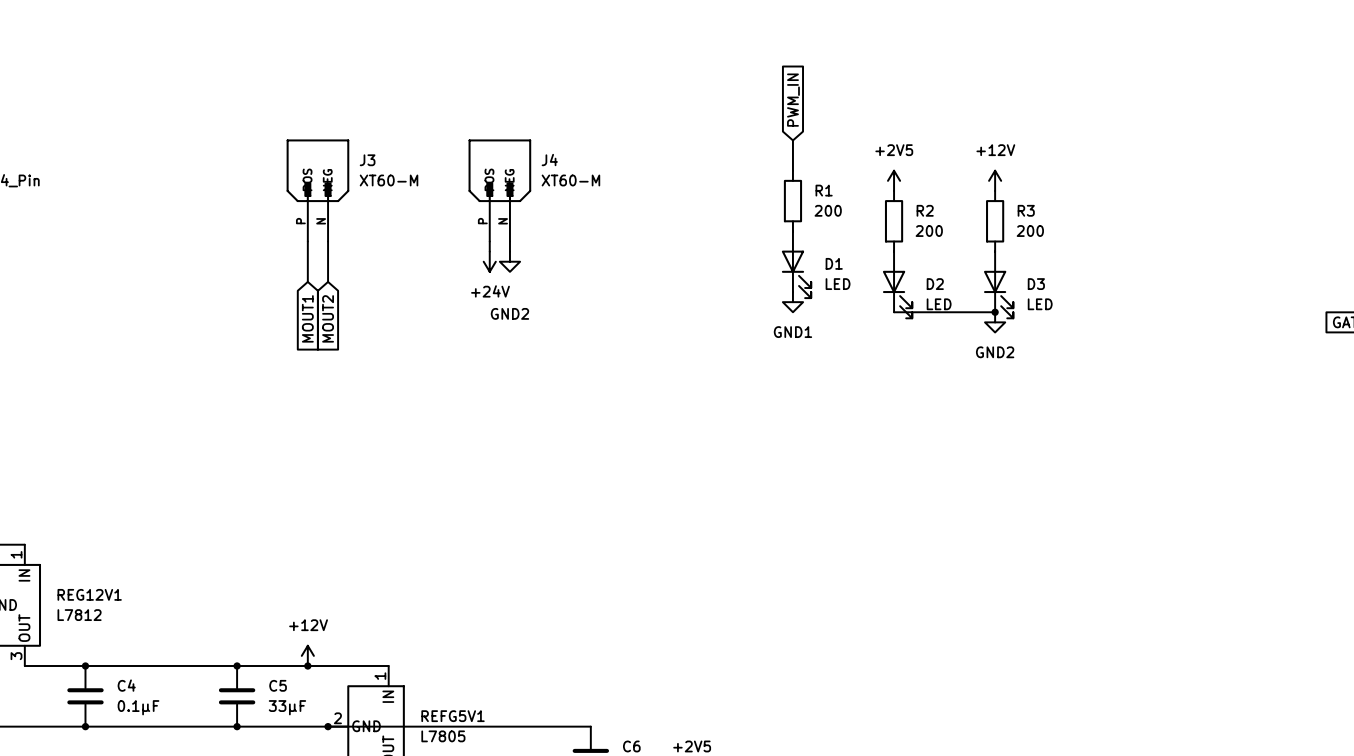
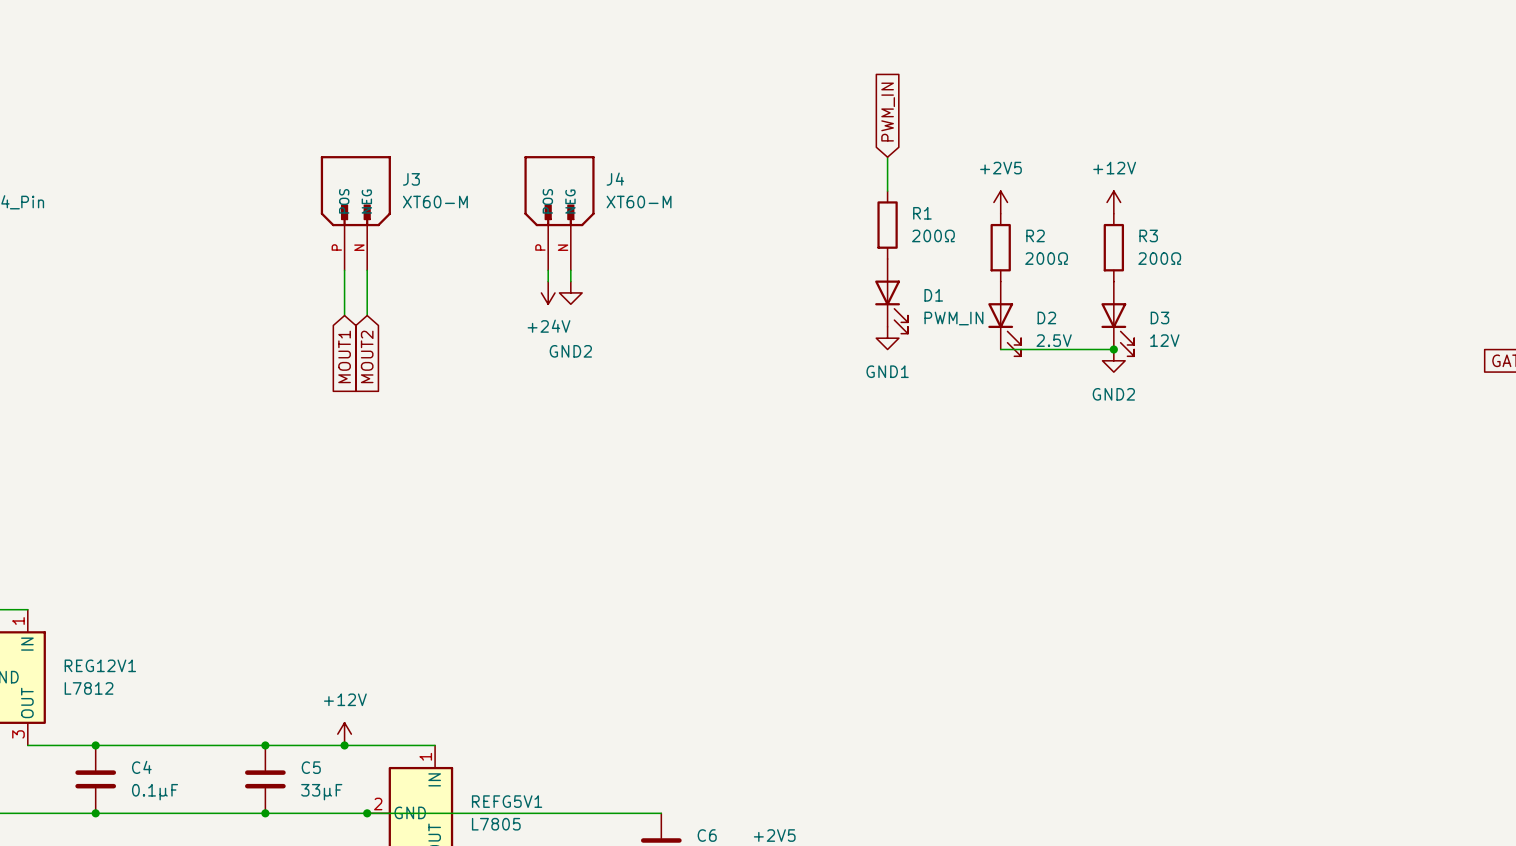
R1 value: 200 (828, 210) -> 200Ω (933, 235)
R2 value: 200 (929, 231) -> 200Ω (1046, 258)
R3 value: 200 (1030, 231) -> 200Ω (1159, 258)
D1 value: LED (838, 284) -> PWM_IN (953, 318)
D2 value: LED (939, 304) -> 2.5V (1054, 340)
D3 value: LED (1040, 304) -> 12V (1164, 340)

